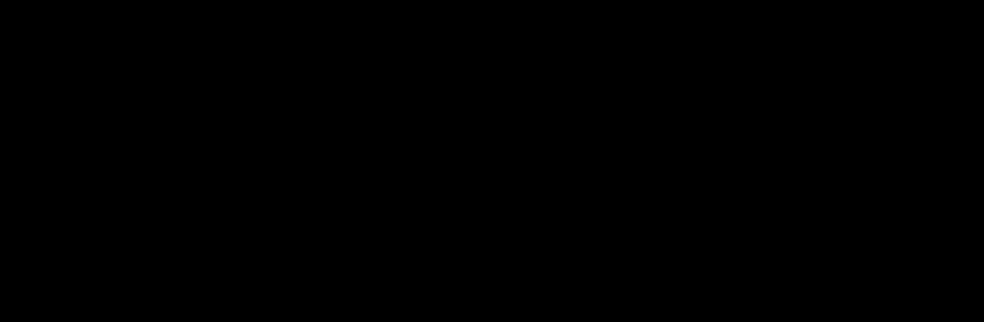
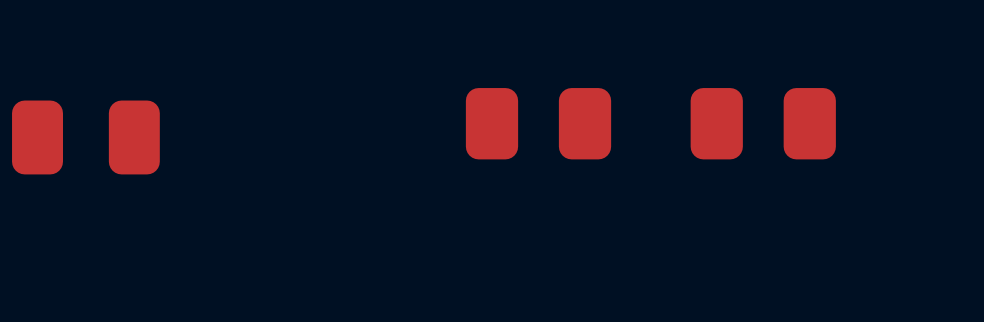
part: none -> (538, 123)
part: none -> (763, 123)
part: none -> (85, 137)

